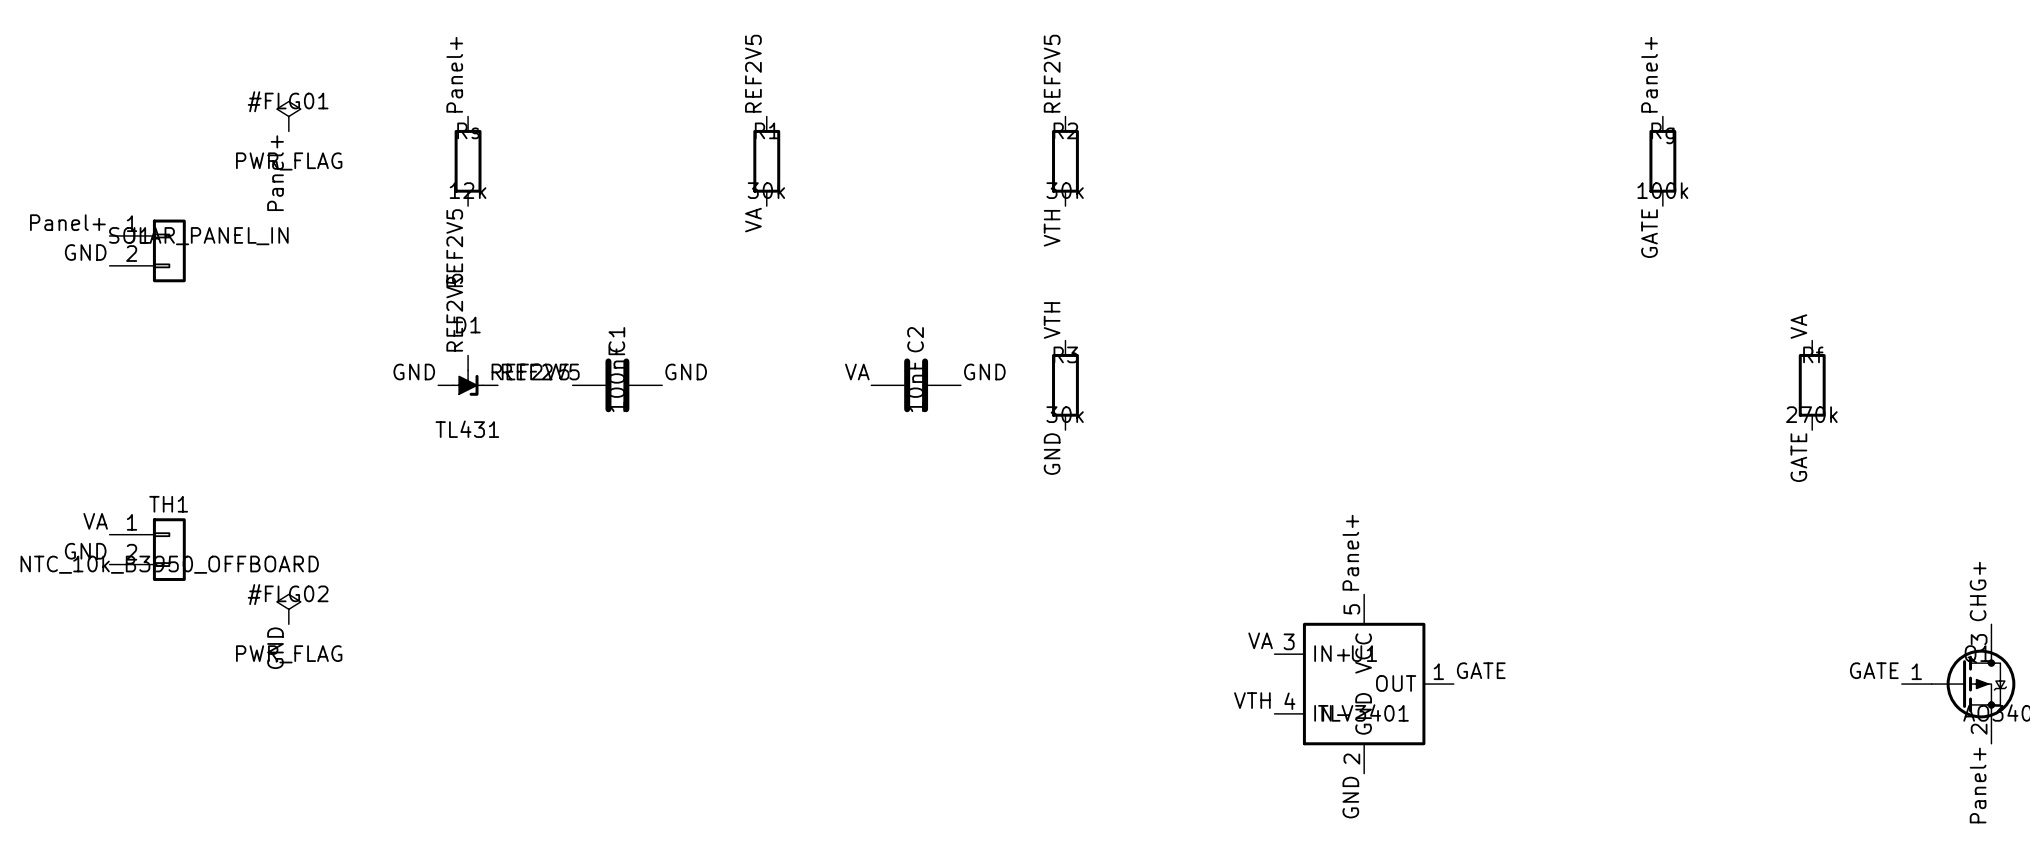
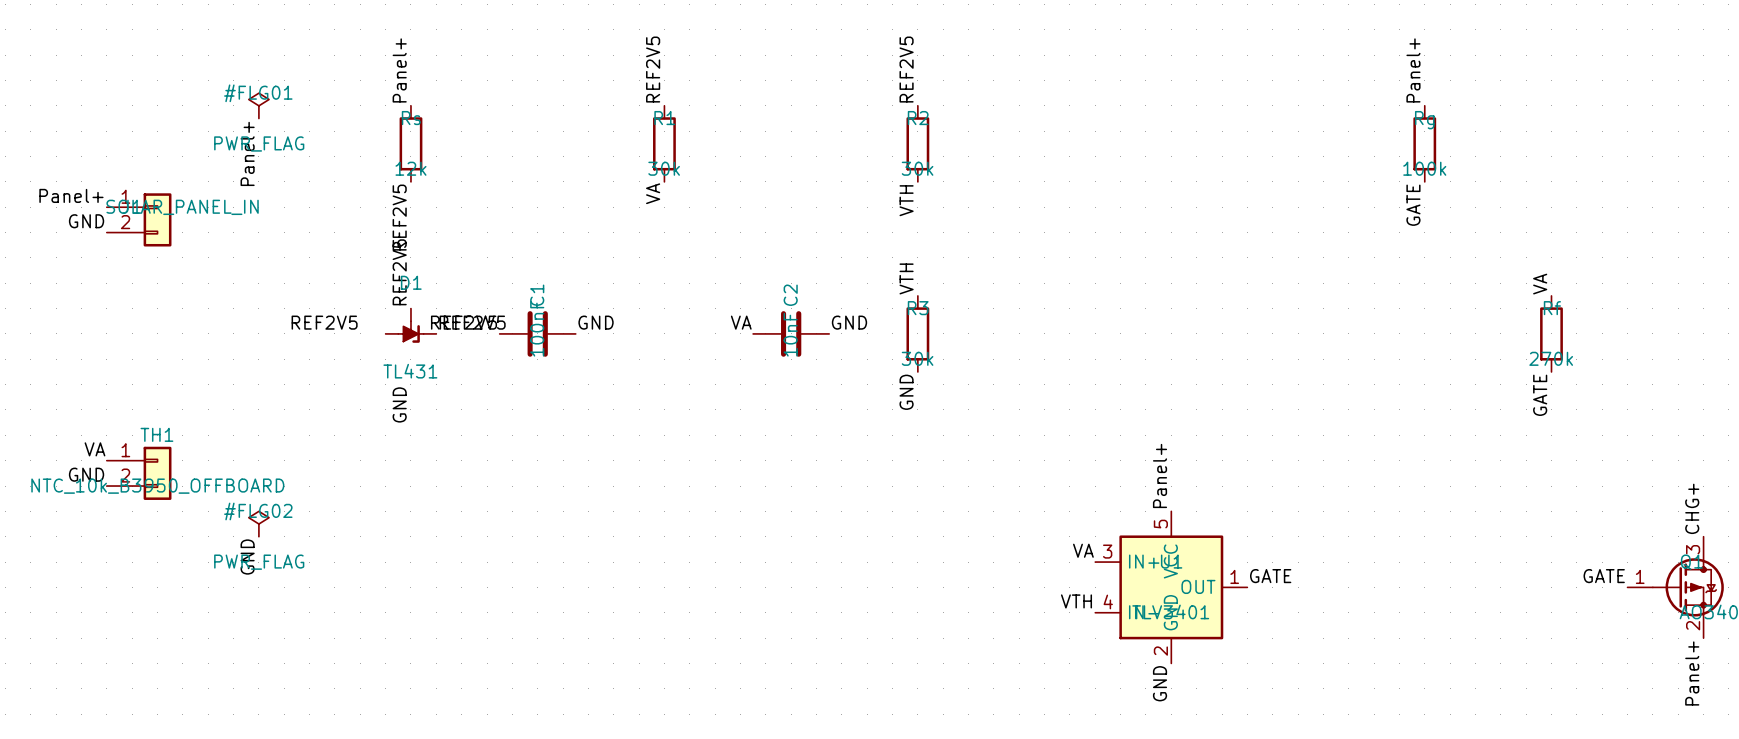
label: none -> REF2V5 (324, 322)
label rotation: 0° (414, 372) -> 90° counterclockwise (399, 404)
label position: GND (414, 372) -> GND (399, 404)

